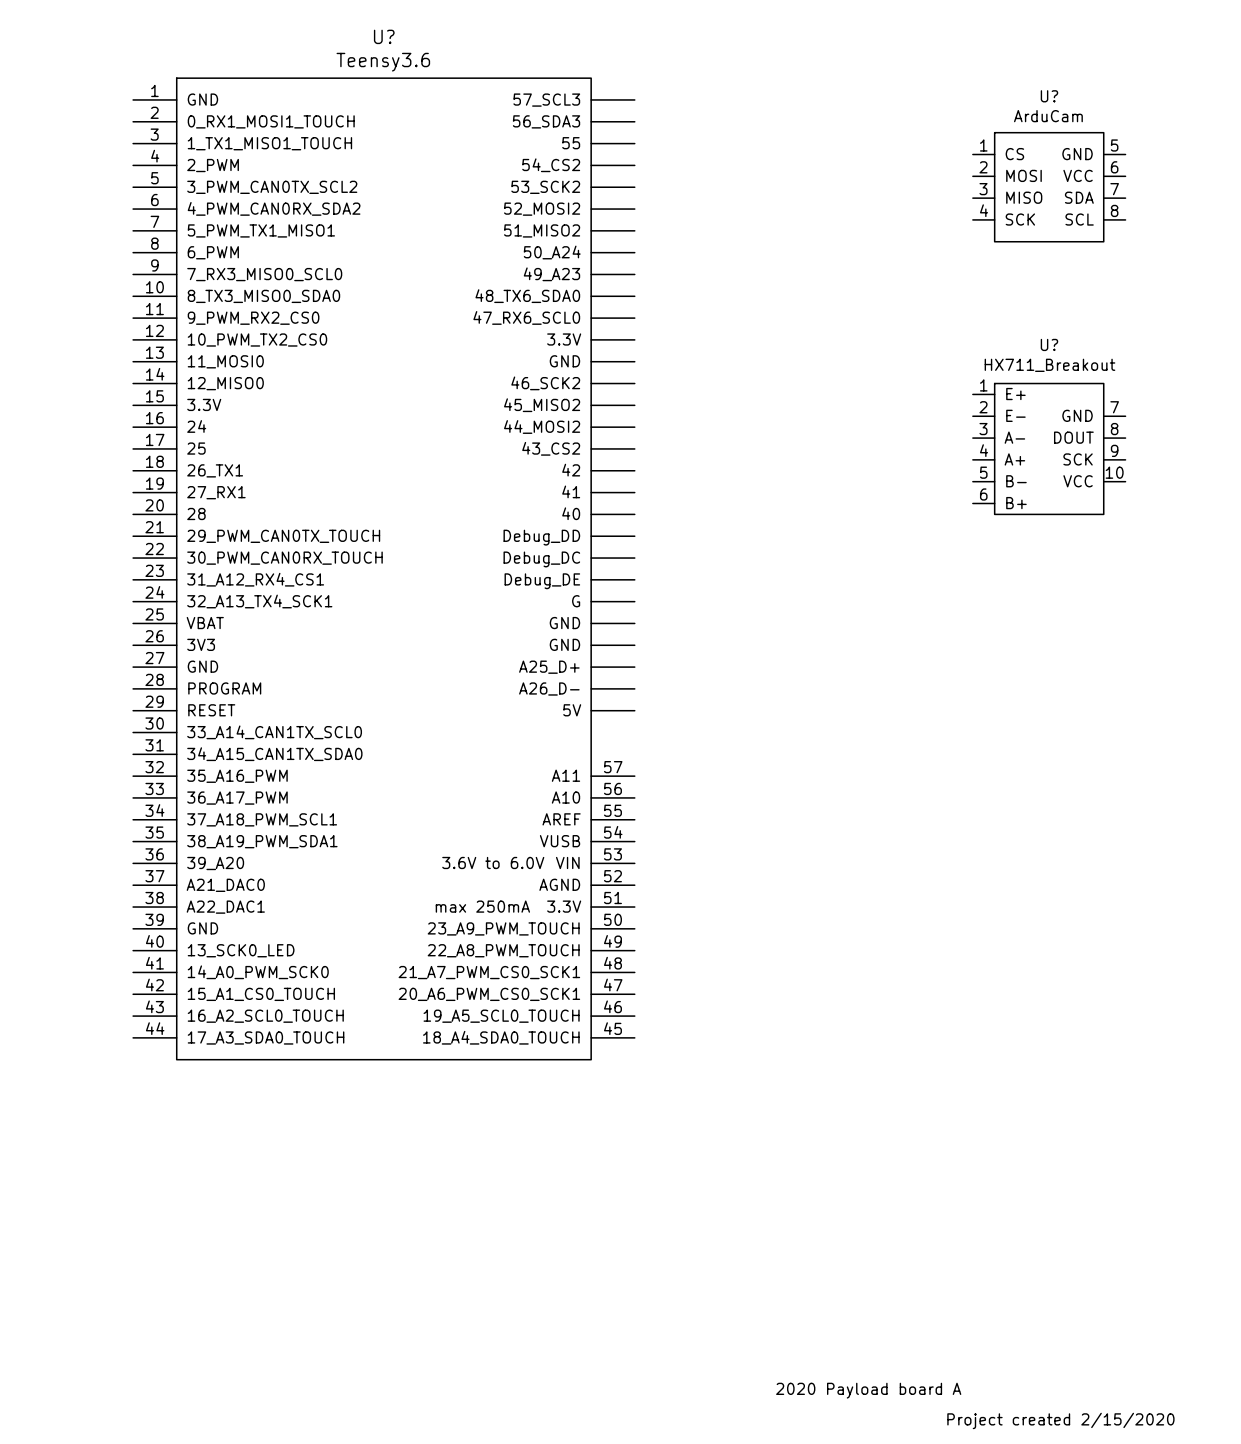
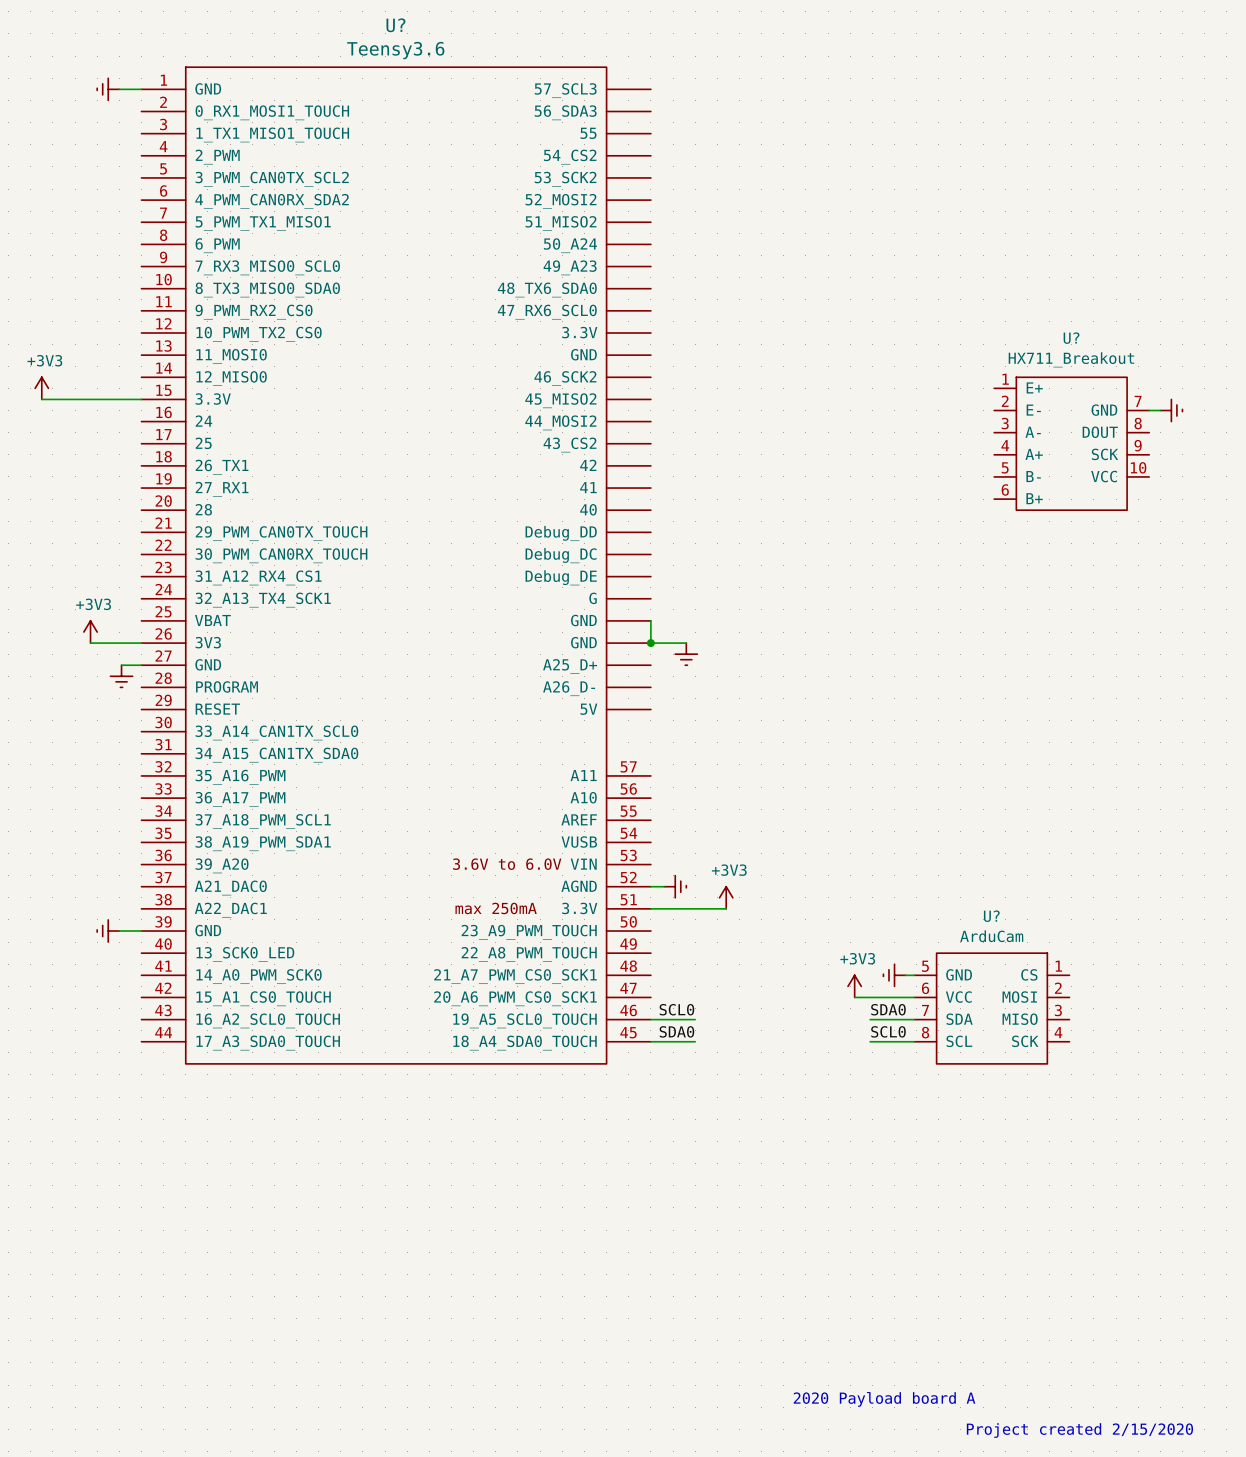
power symbol: none -> (108, 89)
wire: none -> (119, 89) (141, 89)
U?: ArduCam (1049, 187) -> none
power symbol: none -> +3V3 (41, 388)
wire: none -> (41, 399) (141, 399)
wire: none -> (1149, 410) (1160, 410)
power symbol: none -> (1171, 410)
wire: none -> (650, 620) (650, 643) (686, 643)
power symbol: none -> +3V3 (90, 632)
wire: none -> (90, 643) (141, 643)
junction: none -> (650, 643)
power symbol: none -> (686, 654)
wire: none -> (121, 665) (141, 665)
power symbol: none -> (121, 676)
wire: none -> (650, 886) (664, 886)
power symbol: none -> (675, 886)
power symbol: none -> +3V3 (726, 897)
wire: none -> (650, 908) (726, 908)
power symbol: none -> (108, 931)
wire: none -> (119, 931) (141, 931)
power symbol: none -> (894, 975)
wire: none -> (905, 975) (914, 975)
power symbol: none -> +3V3 (854, 986)
wire: none -> (854, 997) (914, 997)
U?: none -> ArduCam (991, 1008)
label: none -> SCL0 (676, 1009)
label: none -> SDA0 (888, 1009)
wire: none -> (650, 1019) (695, 1019)
wire: none -> (870, 1019) (914, 1019)
label: none -> SDA0 (676, 1031)
label: none -> SCL0 (888, 1031)
wire: none -> (650, 1041) (695, 1041)
wire: none -> (870, 1041) (914, 1041)

